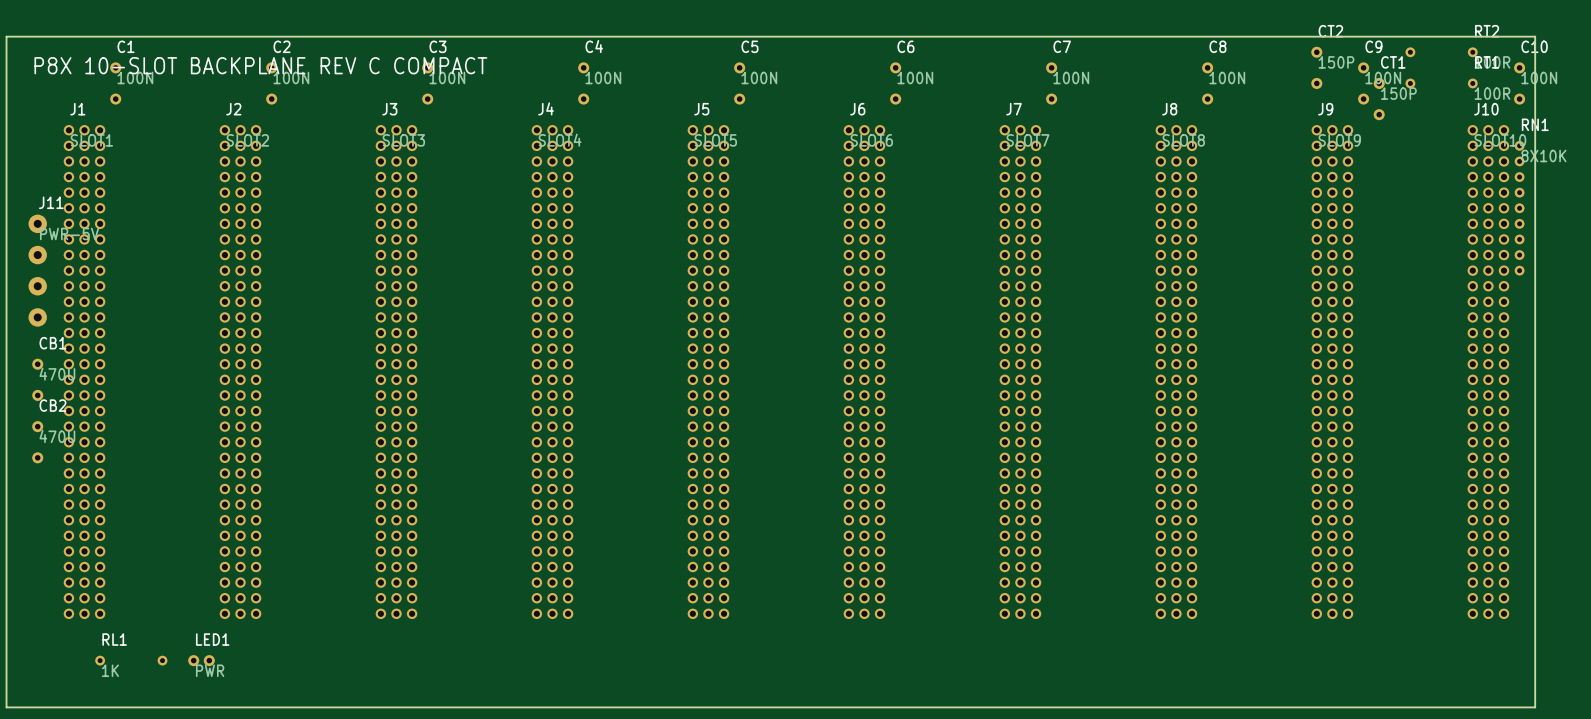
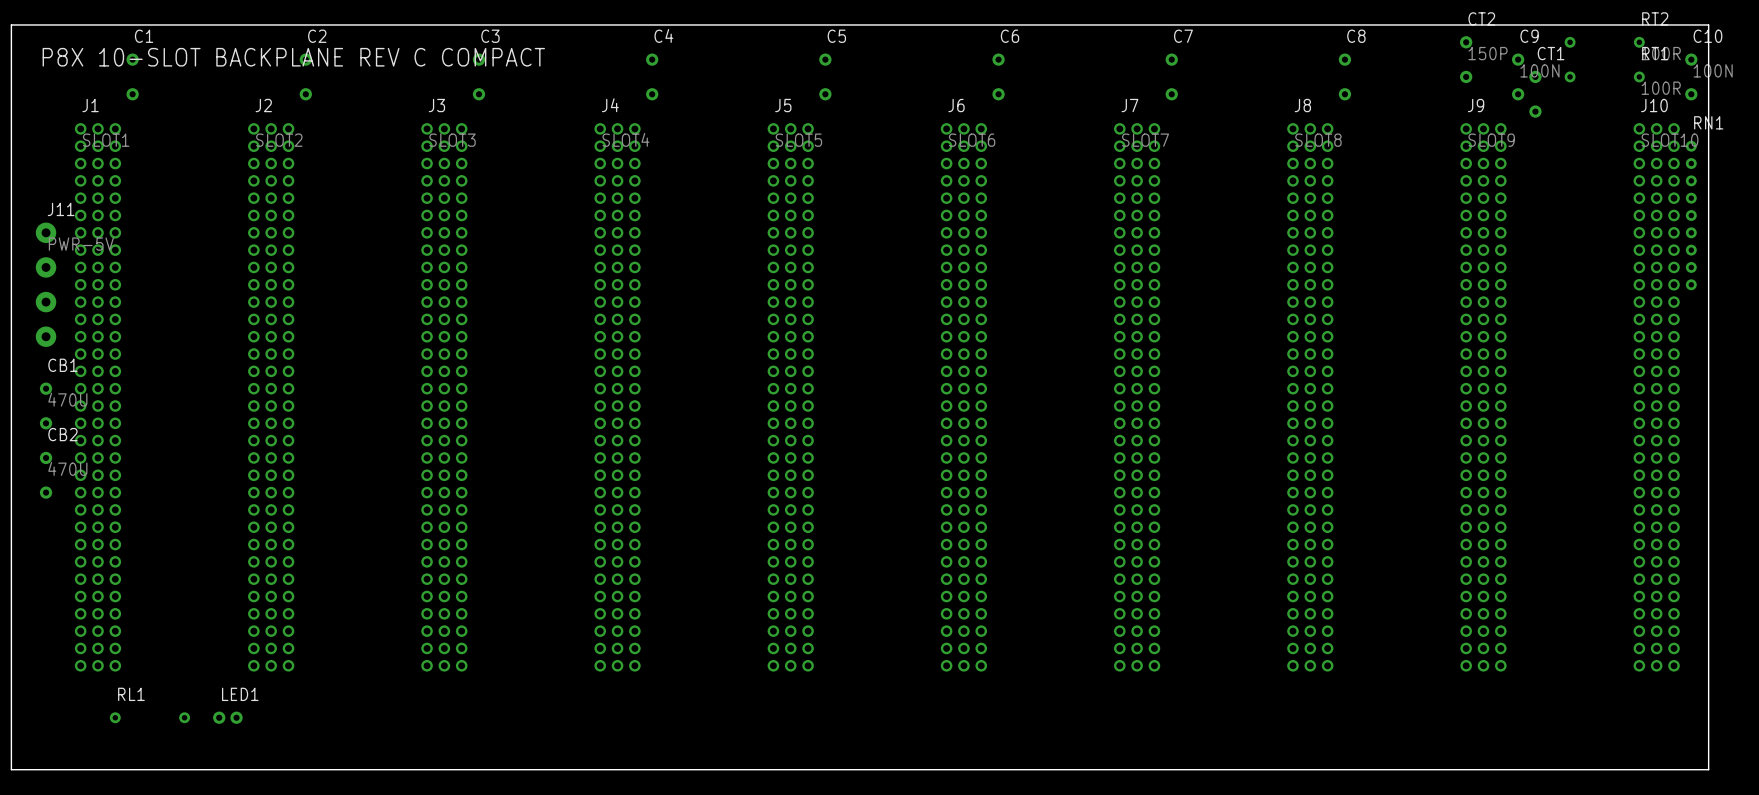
C1 value: 100N (135, 78) -> none
C2 value: 100N (291, 78) -> none
C3 value: 100N (447, 78) -> none
C4 value: 100N (603, 78) -> none
C5 value: 100N (759, 78) -> none
C6 value: 100N (915, 78) -> none
C7 value: 100N (1071, 78) -> none
C8 value: 100N (1227, 78) -> none
CT1 value: 150P (1398, 93) -> none
RN1 value: 8X10K (1543, 155) -> none
RL1 value: 1K (110, 670) -> none
LED1 value: PWR (210, 670) -> none

